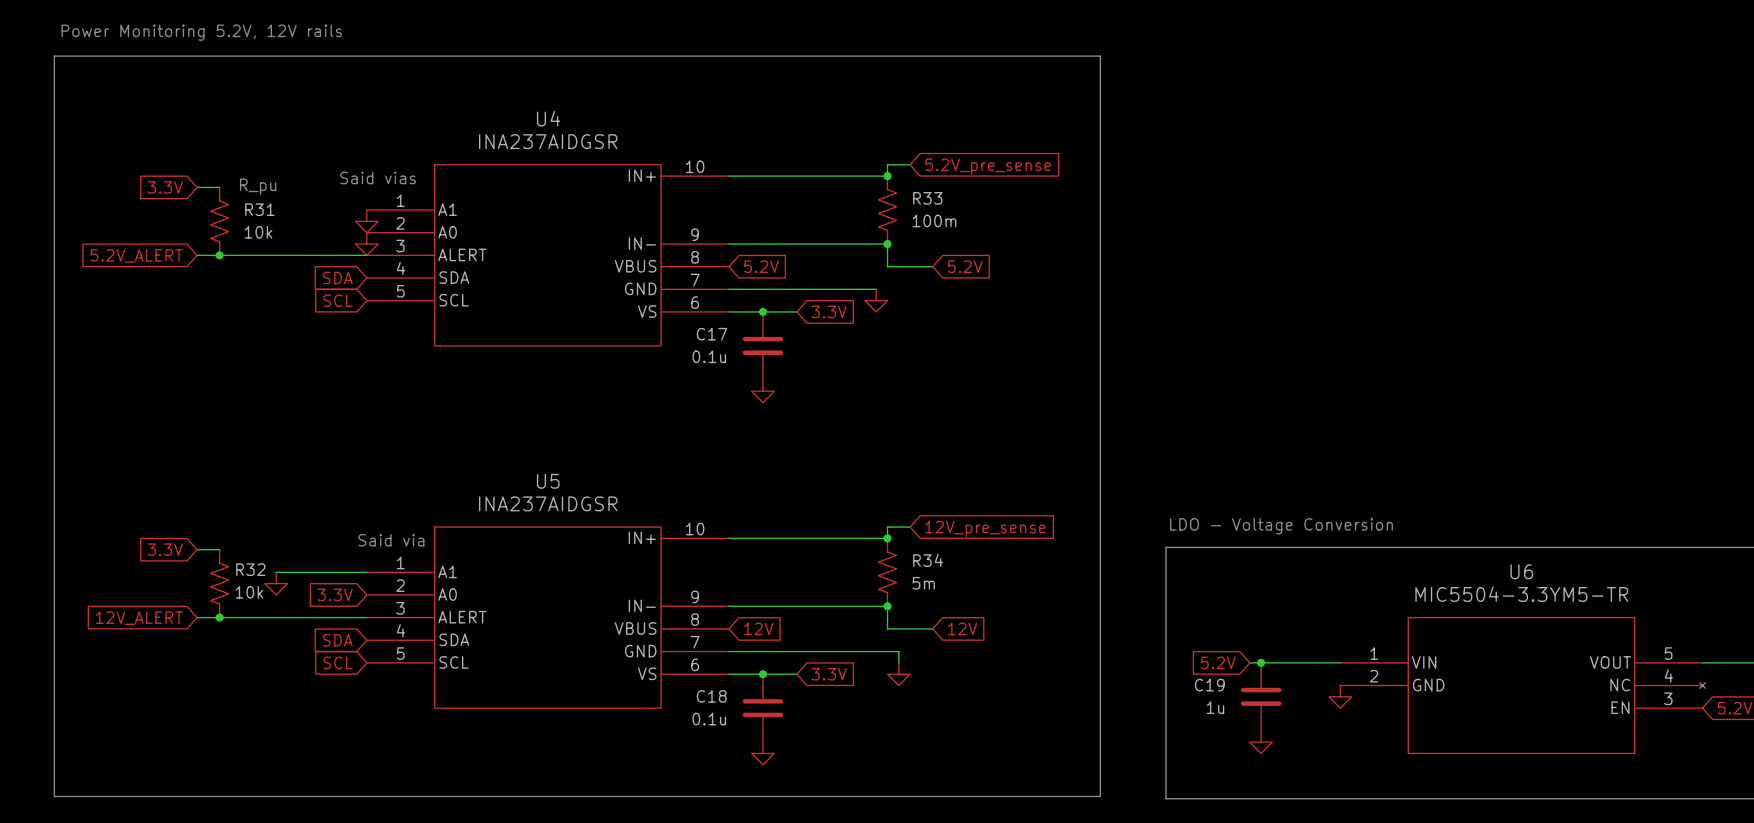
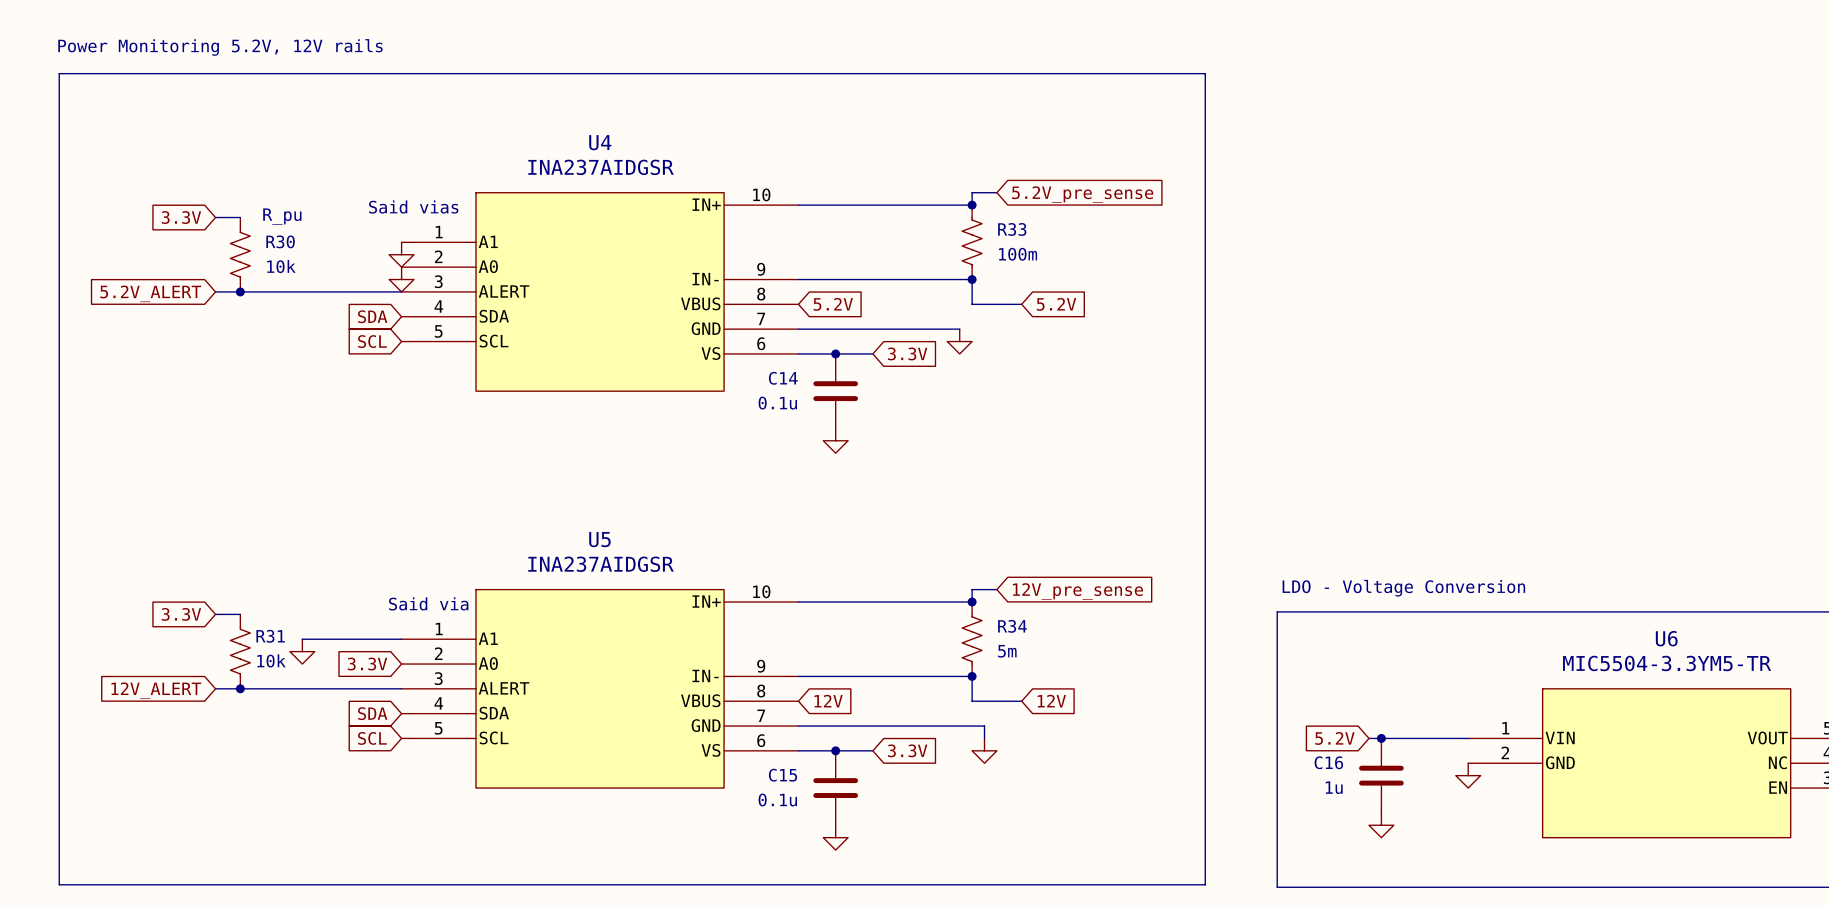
R31 name: R31 (259, 209) -> R30 (280, 241)
C17 name: C17 (711, 334) -> C14 (783, 378)
R32 name: R32 (250, 569) -> R31 (270, 636)
C19 name: C19 (1209, 685) -> C16 (1328, 762)
C18 name: C18 (711, 696) -> C15 (783, 775)

